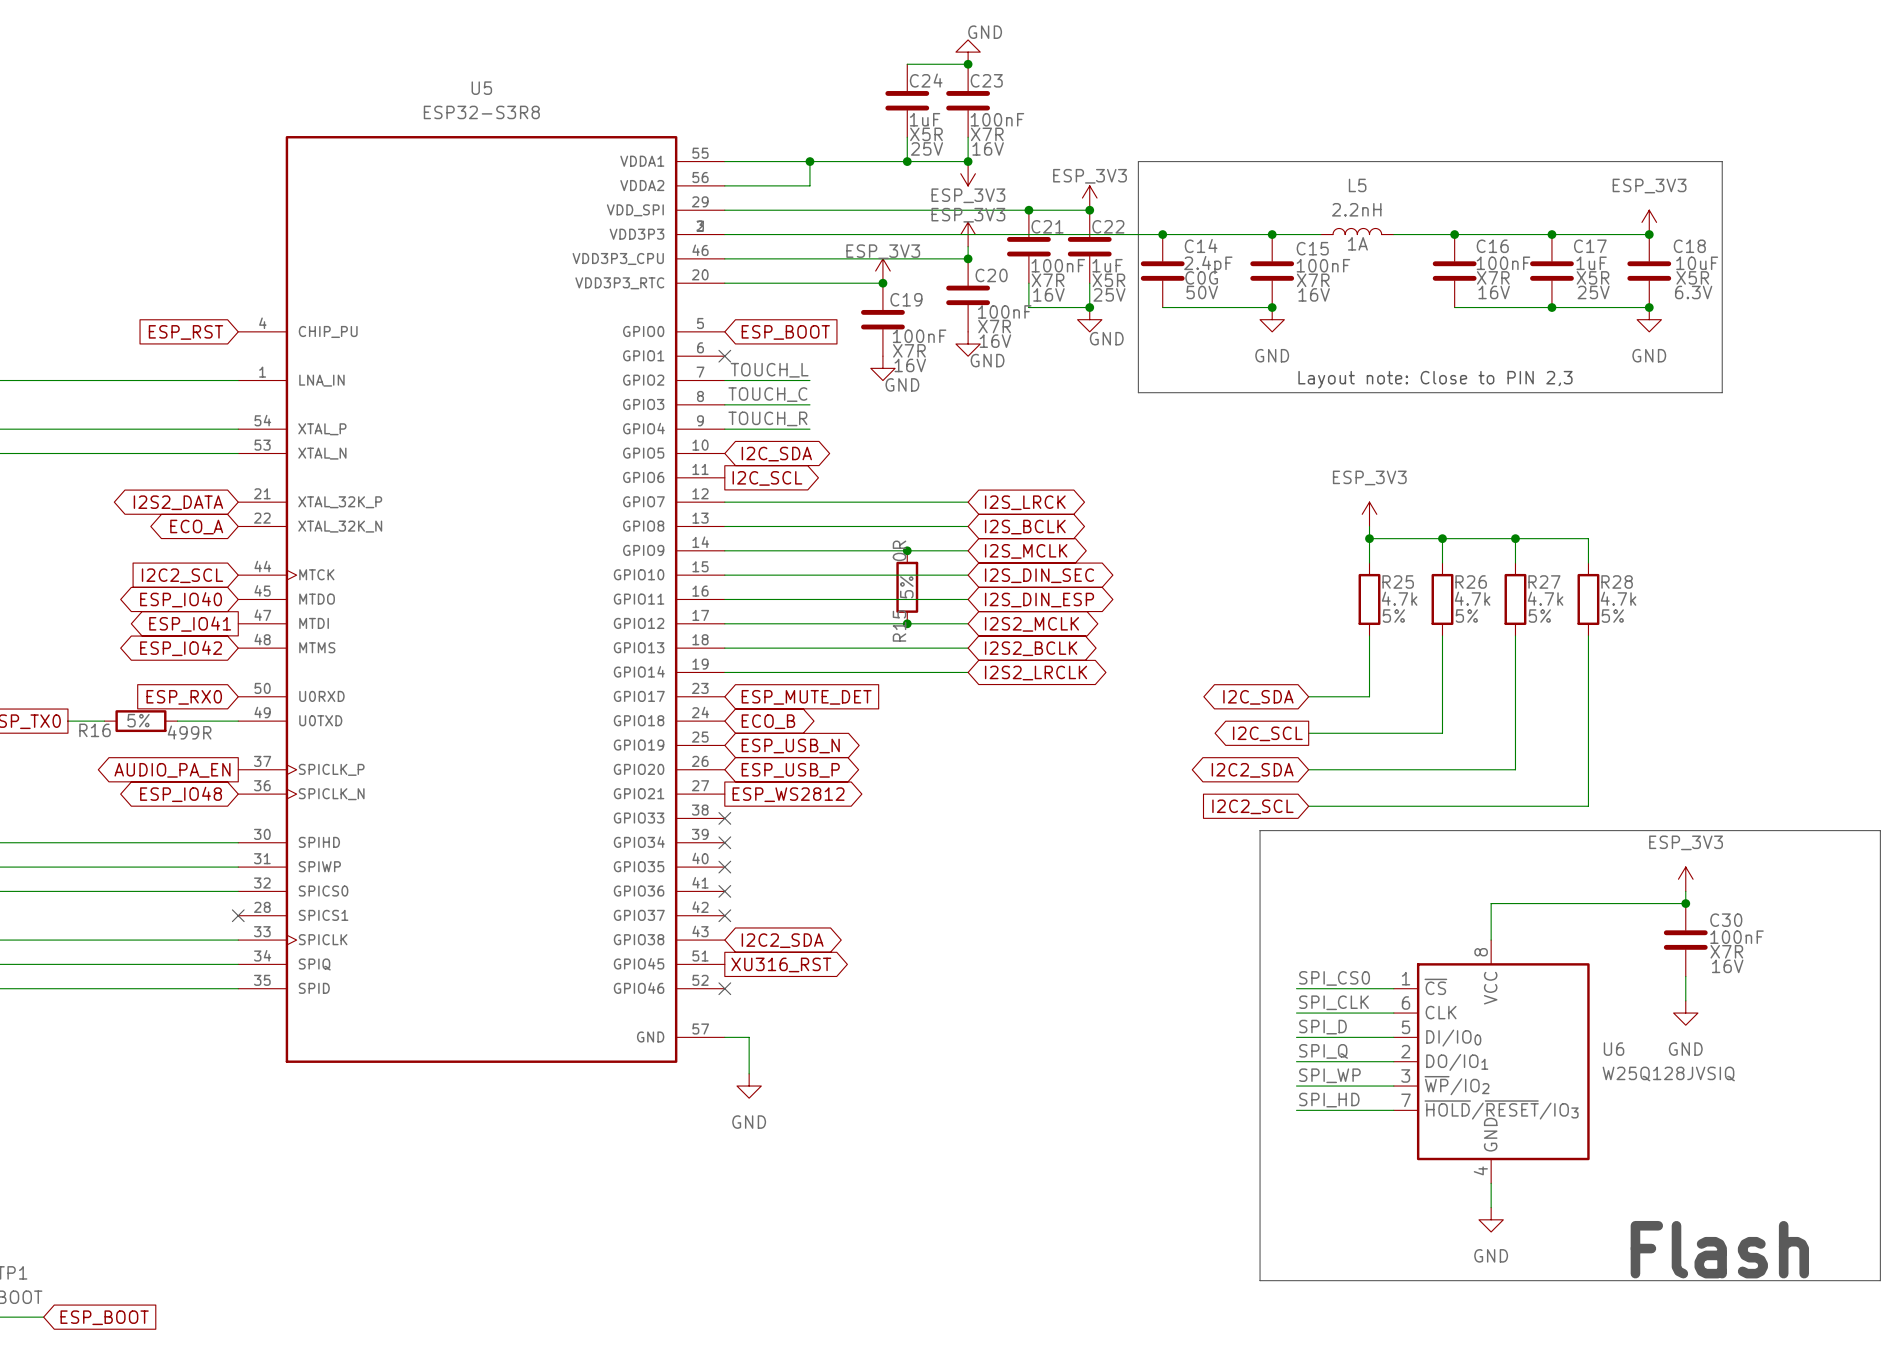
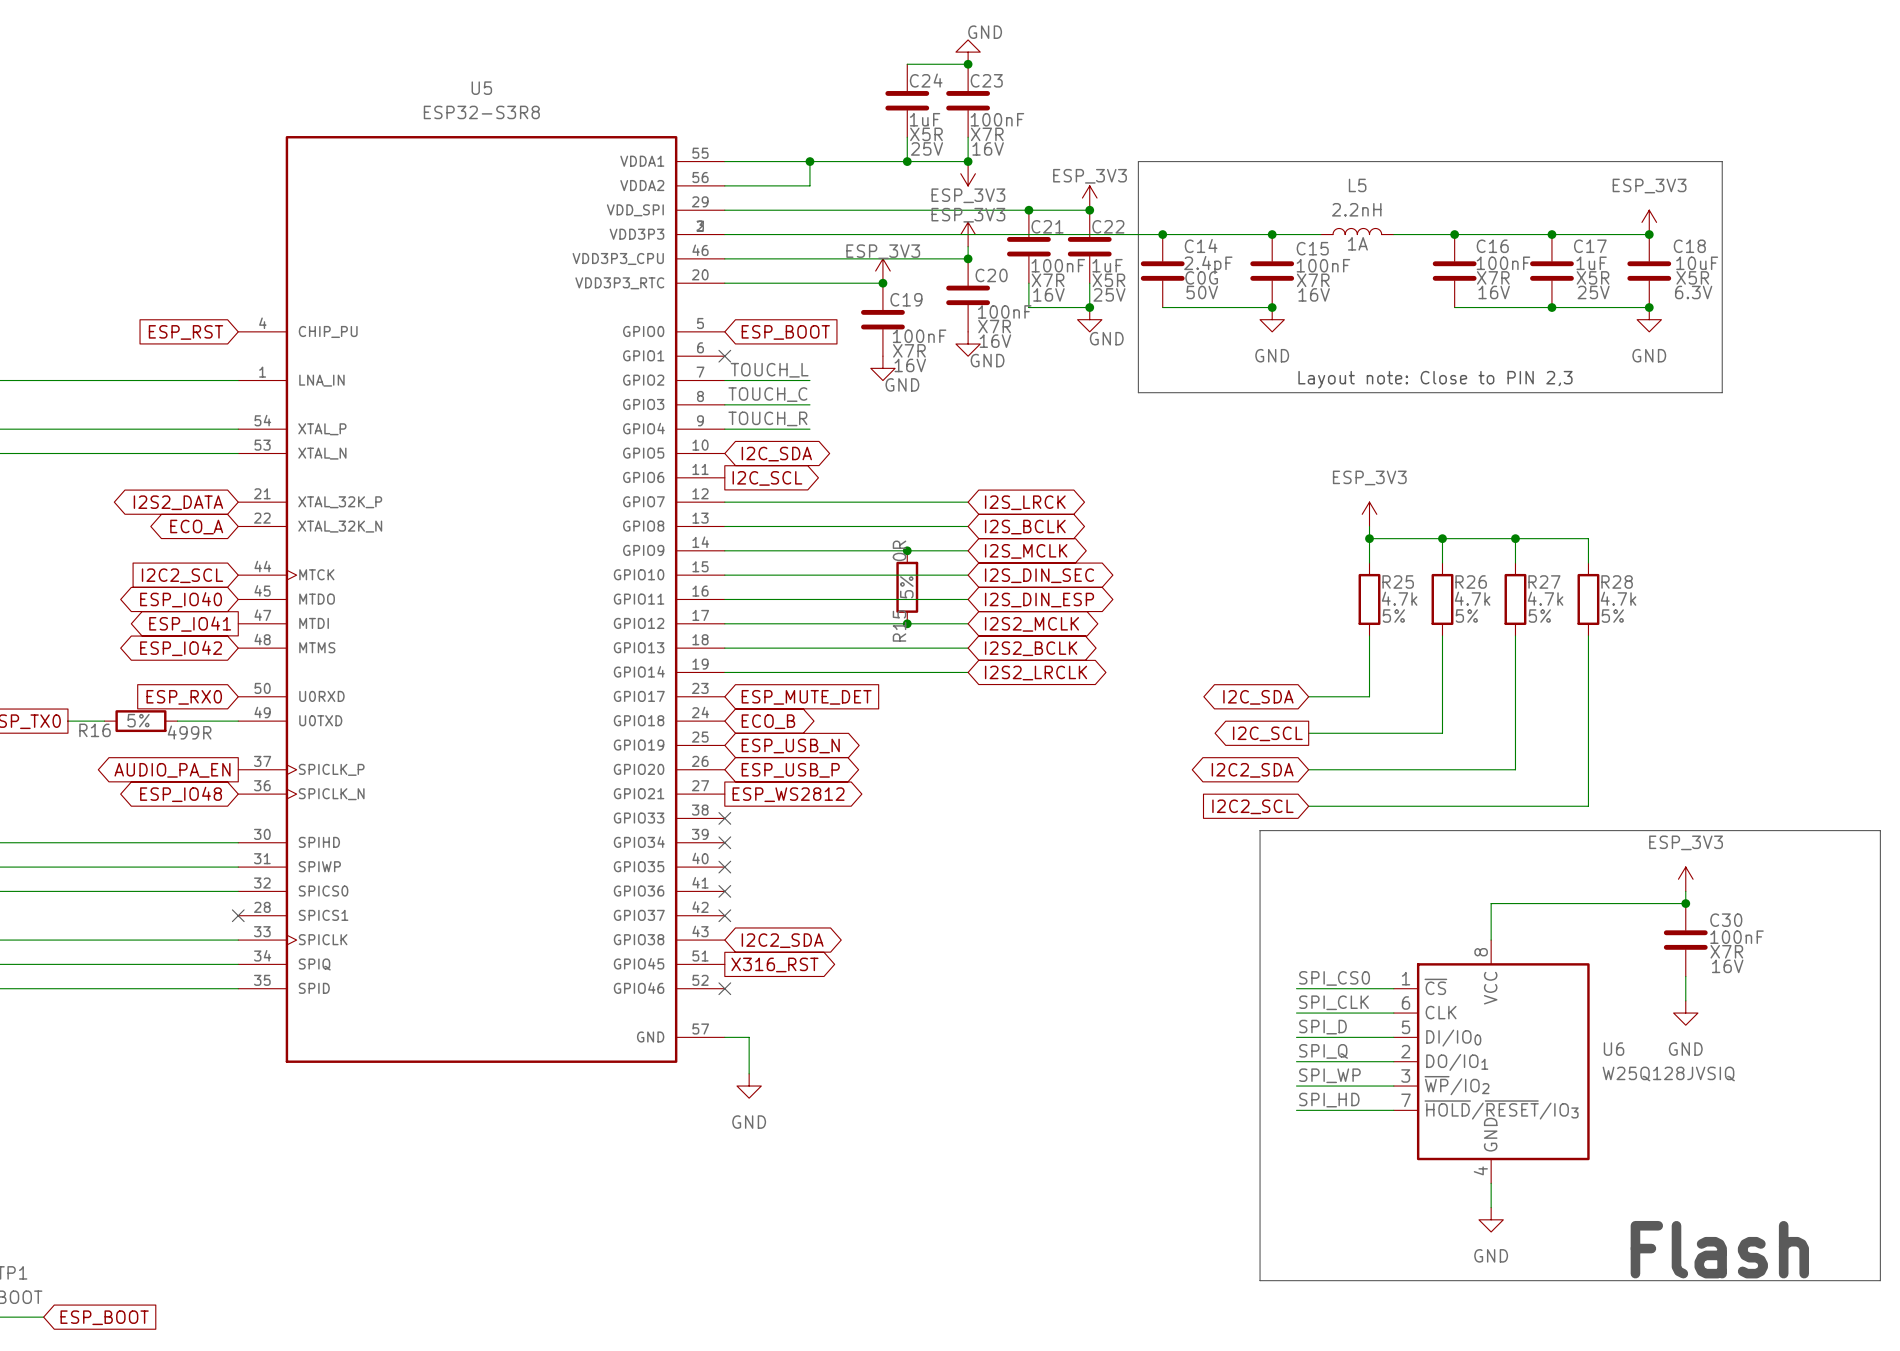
global label: XU316_RST (781, 964) -> X316_RST (774, 964)

